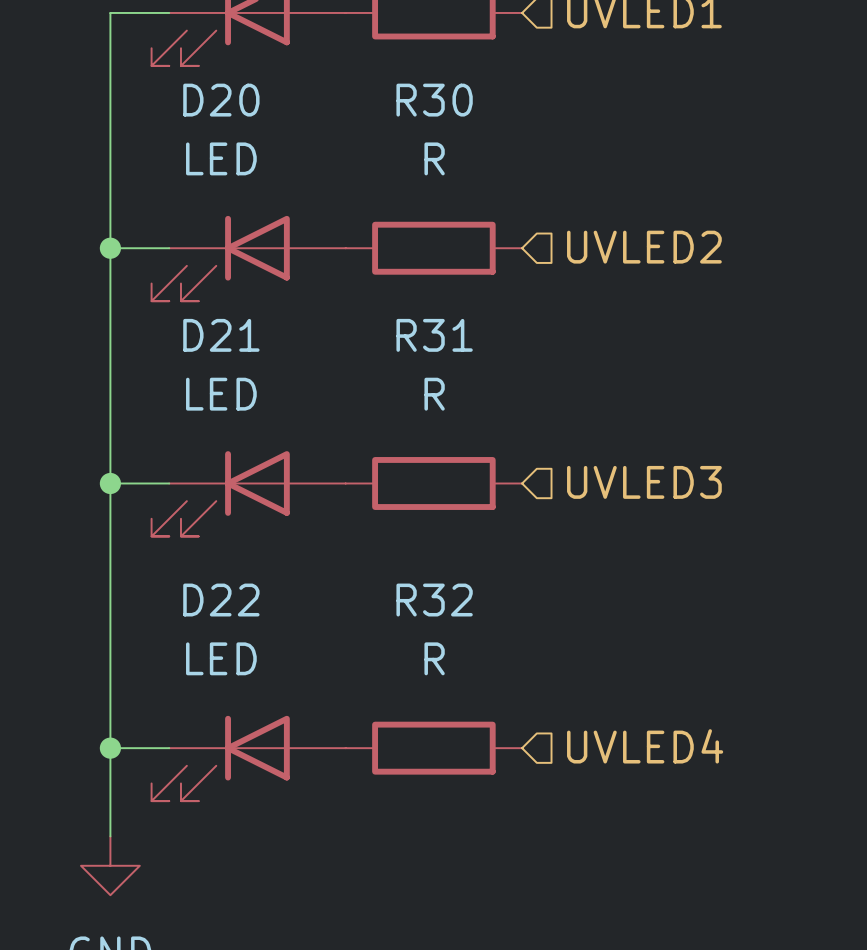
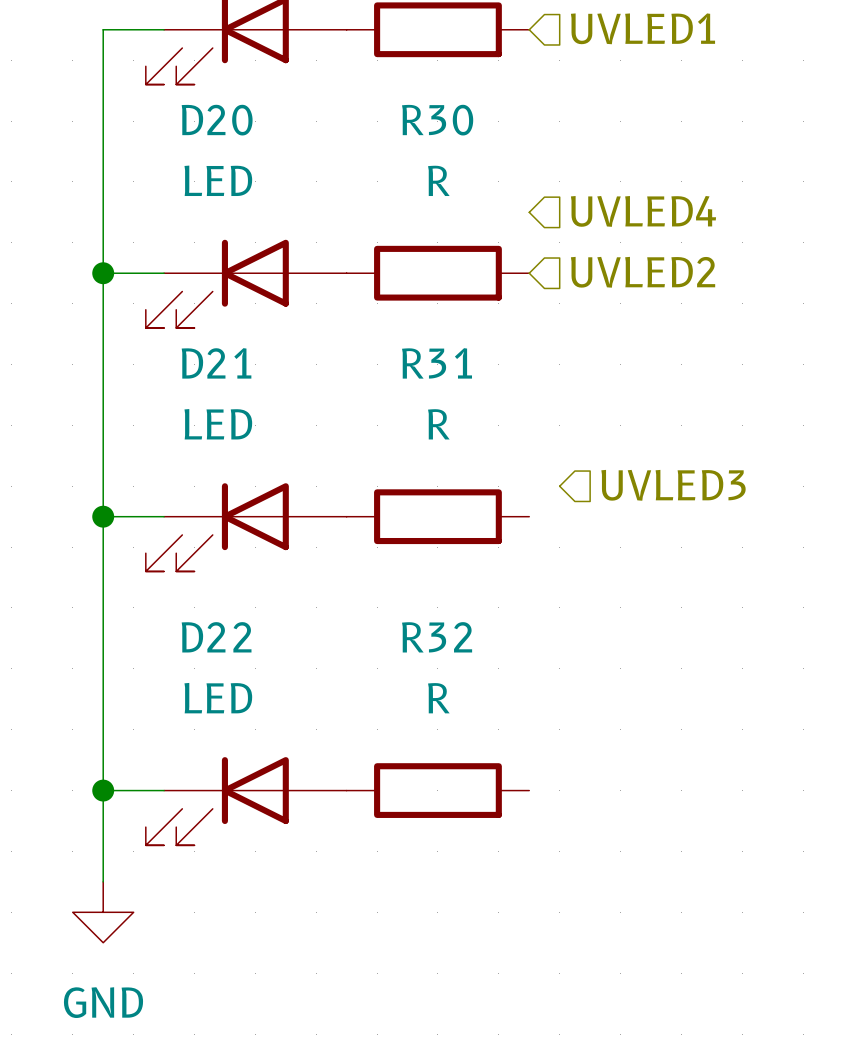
hierarchical label position: UVLED3 (644, 482) -> UVLED3 (673, 485)
hierarchical label position: UVLED4 (645, 746) -> UVLED4 (643, 211)

